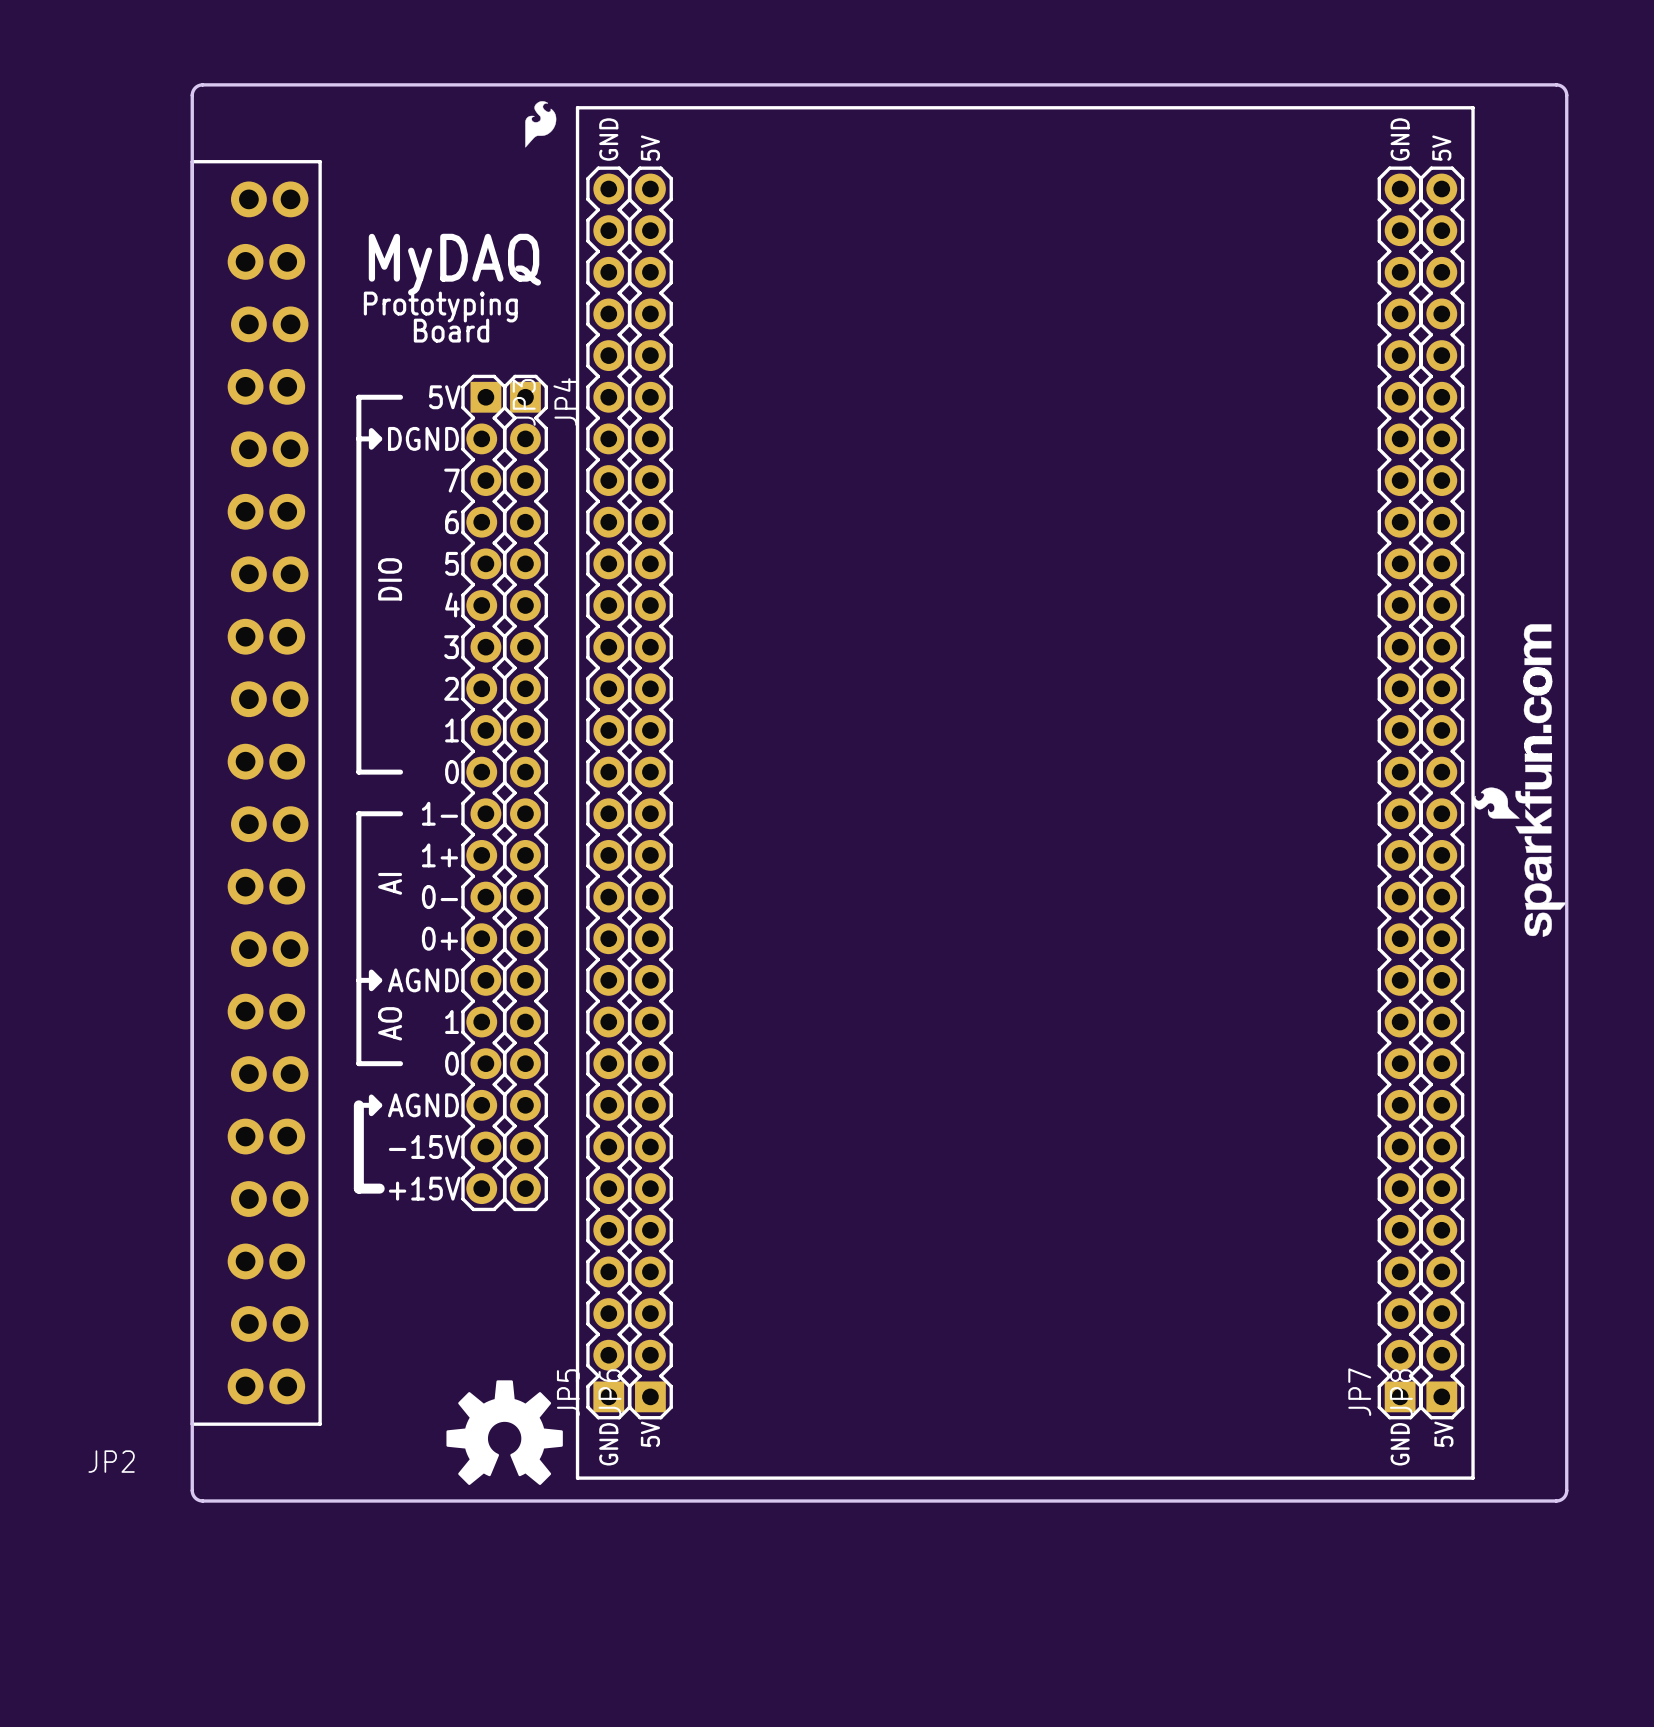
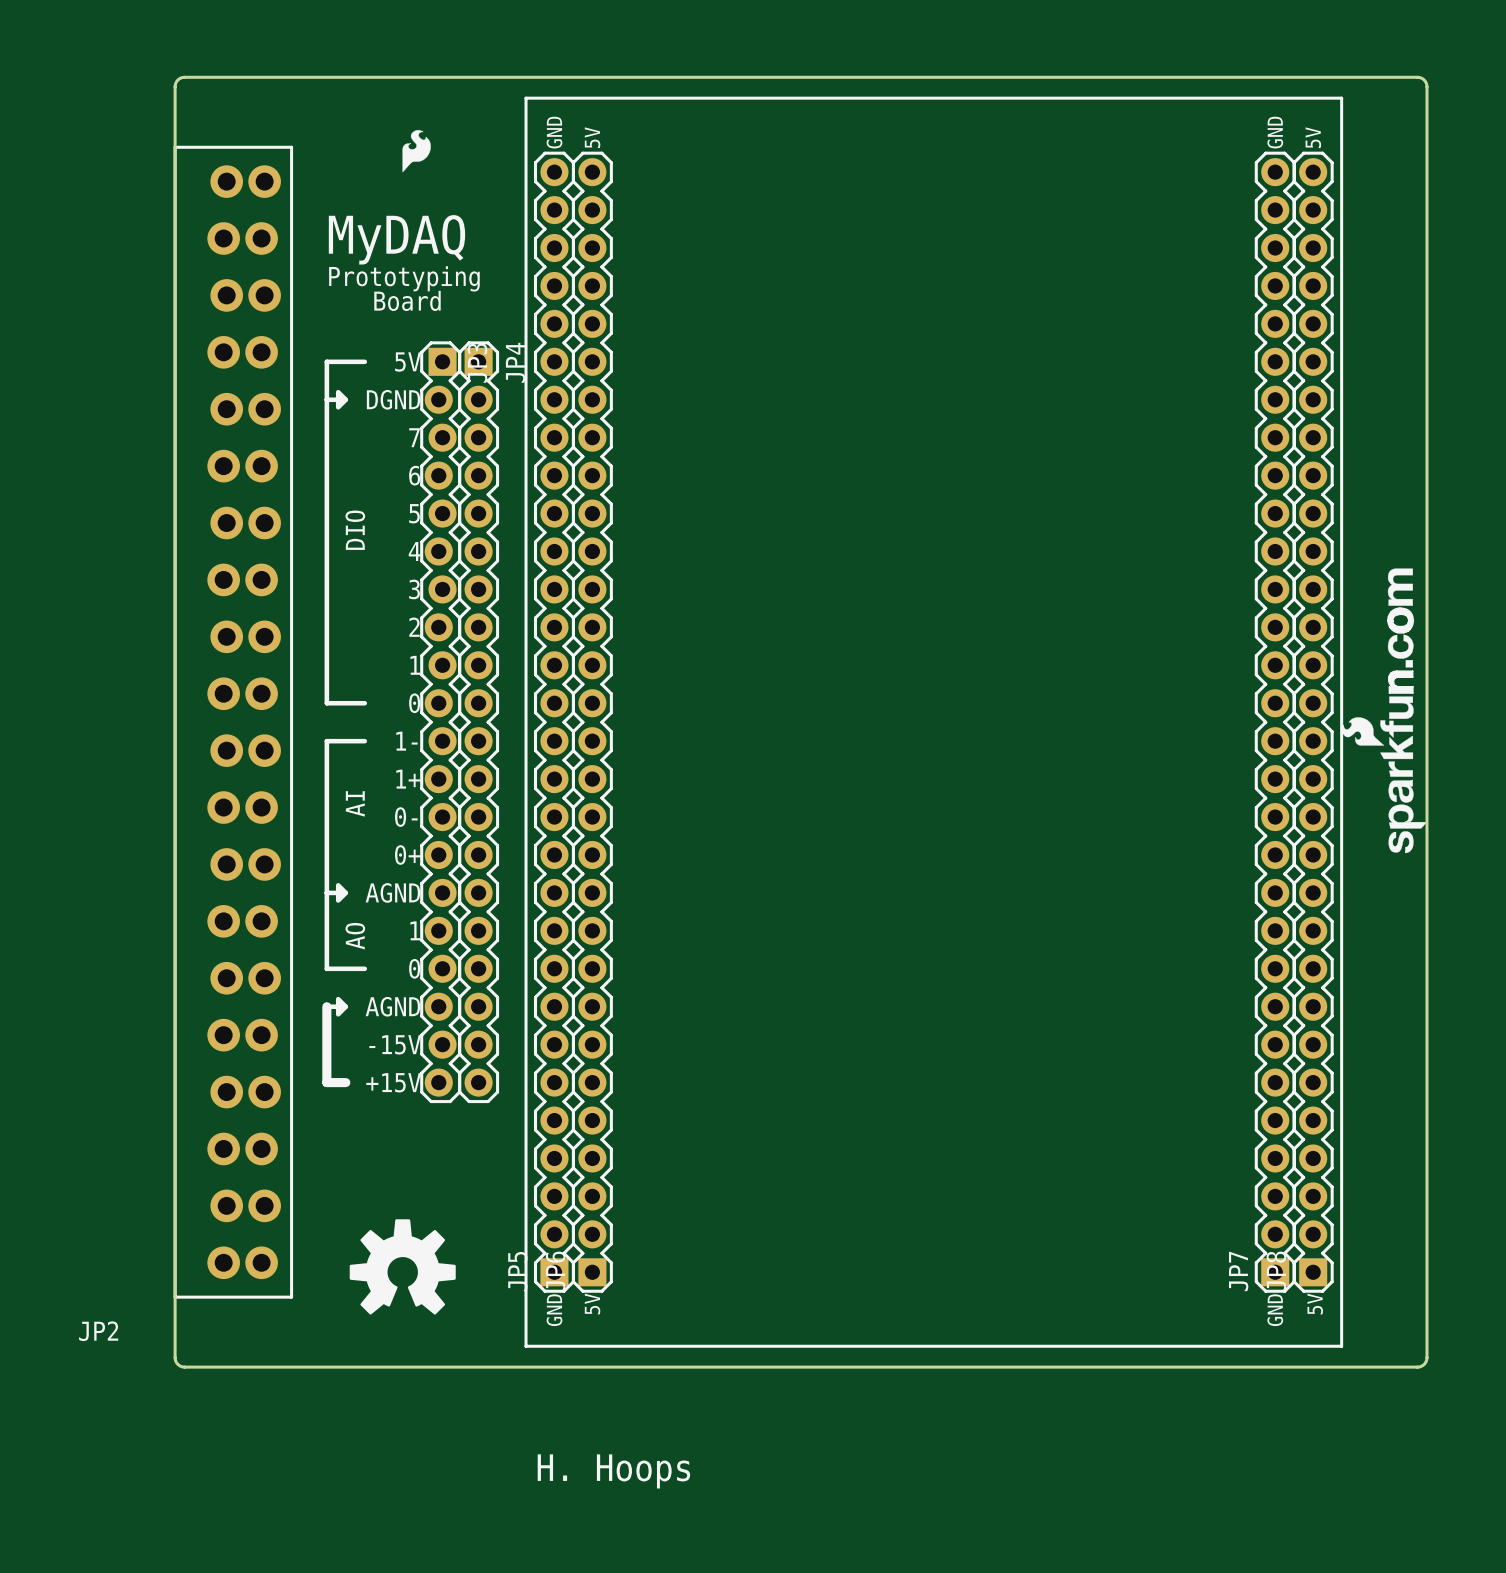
drawing position: (540, 124) -> (416, 151)
drawing position: (504, 1432) -> (402, 1266)
text: none -> H. Hoops (613, 1471)

